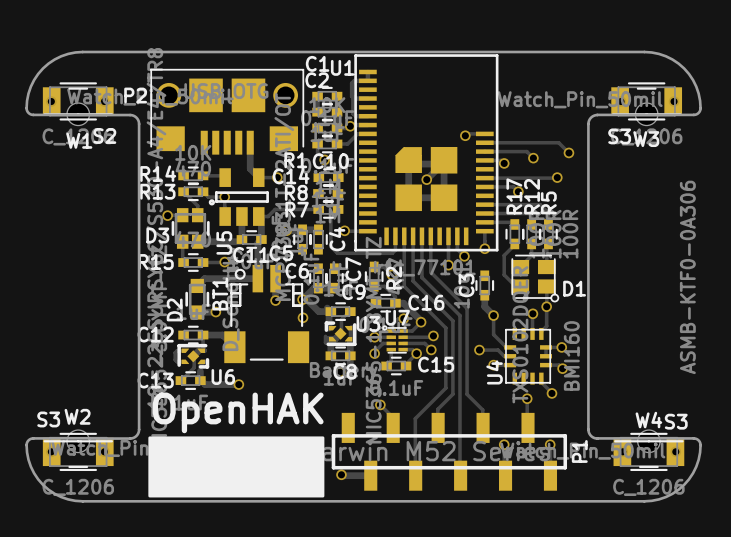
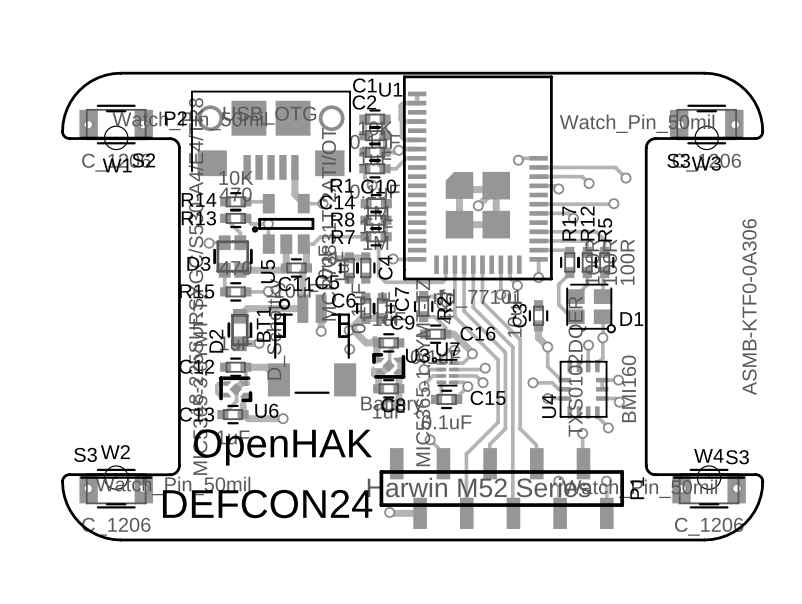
drawing: [148, 436, 325, 498] -> none
text: none -> DEFCON24 (267, 504)

